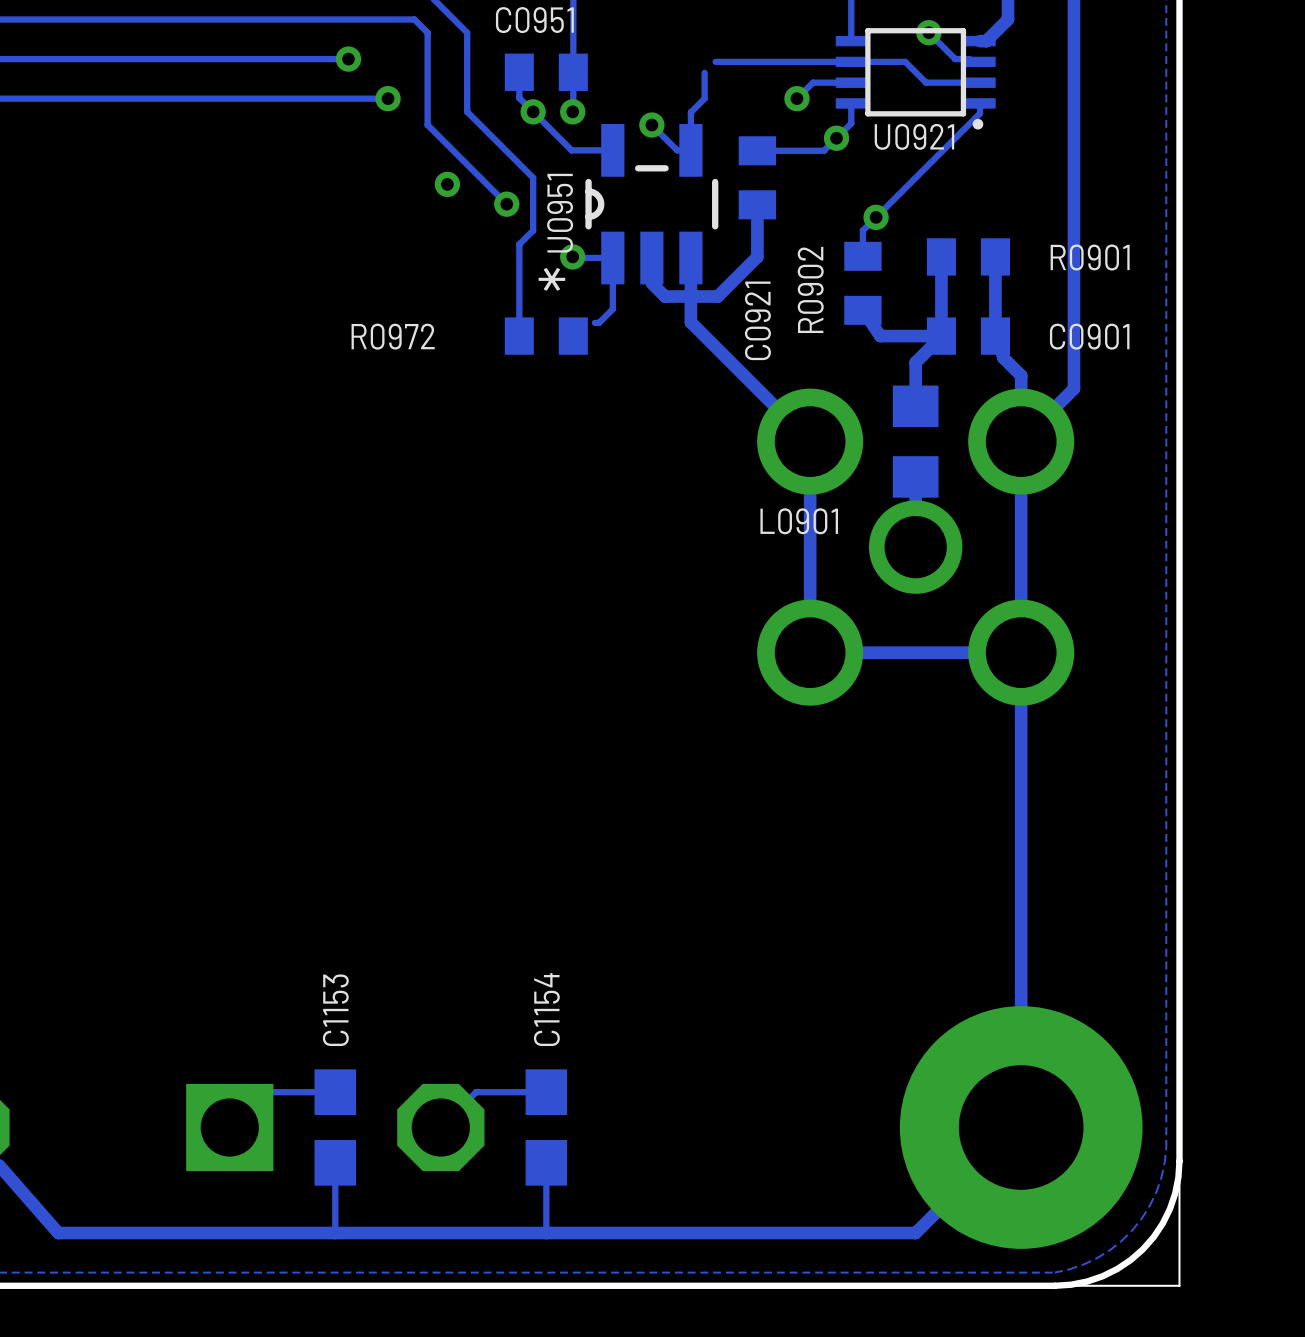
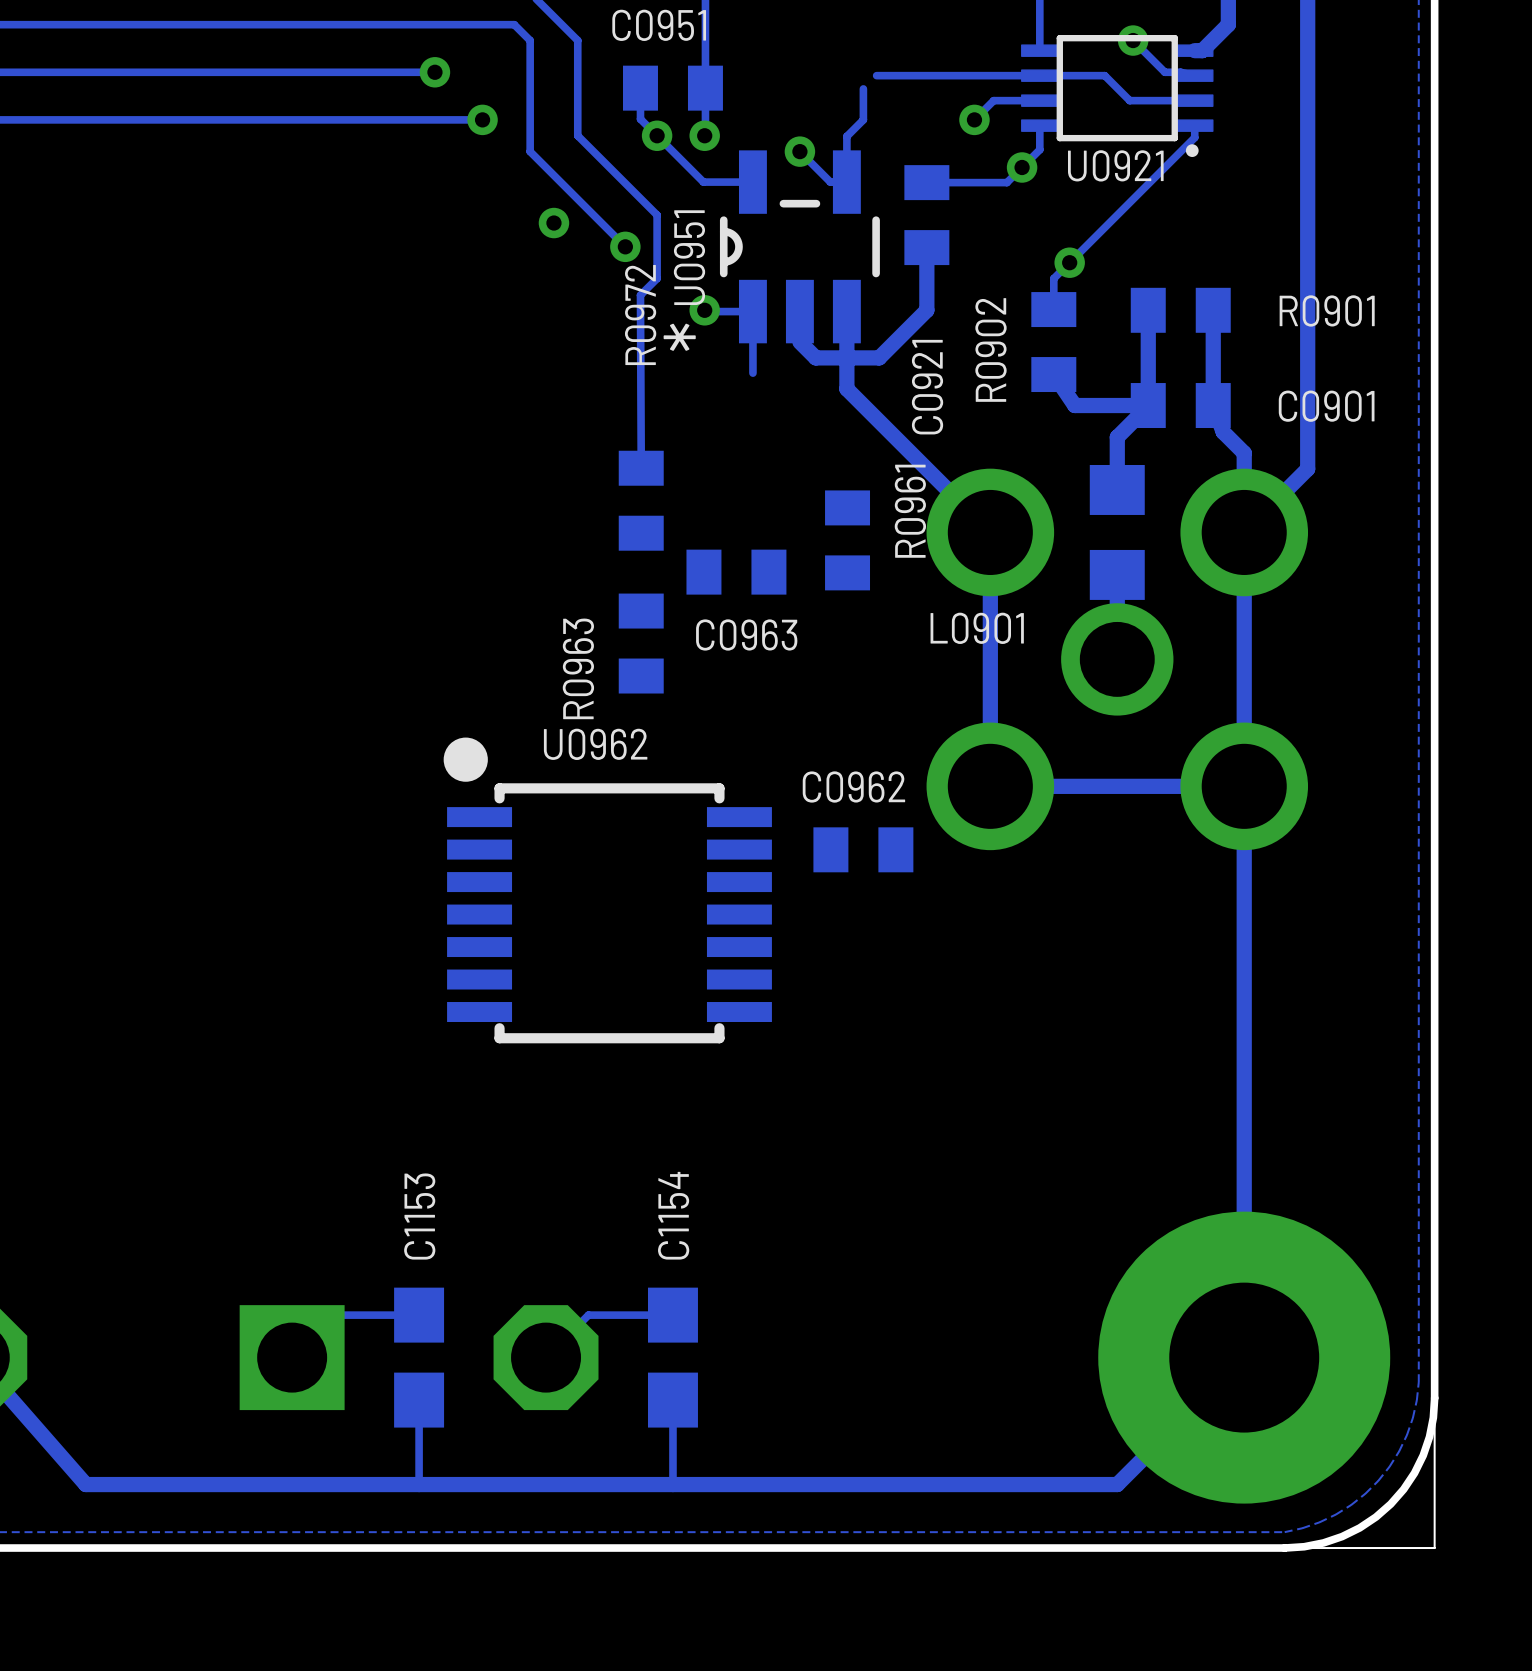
track: (519, 244) (519, 336) -> (640, 295) (641, 468)
track: (612, 309) (599, 322) (594, 322) -> none
R0972 rotation: 0° (546, 336) -> 90° clockwise (641, 500)
R0972 position: (546, 336) -> (641, 500)
R0961: none -> (847, 540)
C0963: none -> (736, 572)
R0963: none -> (641, 643)
C0962: none -> (863, 849)
U0962: none -> (607, 890)

